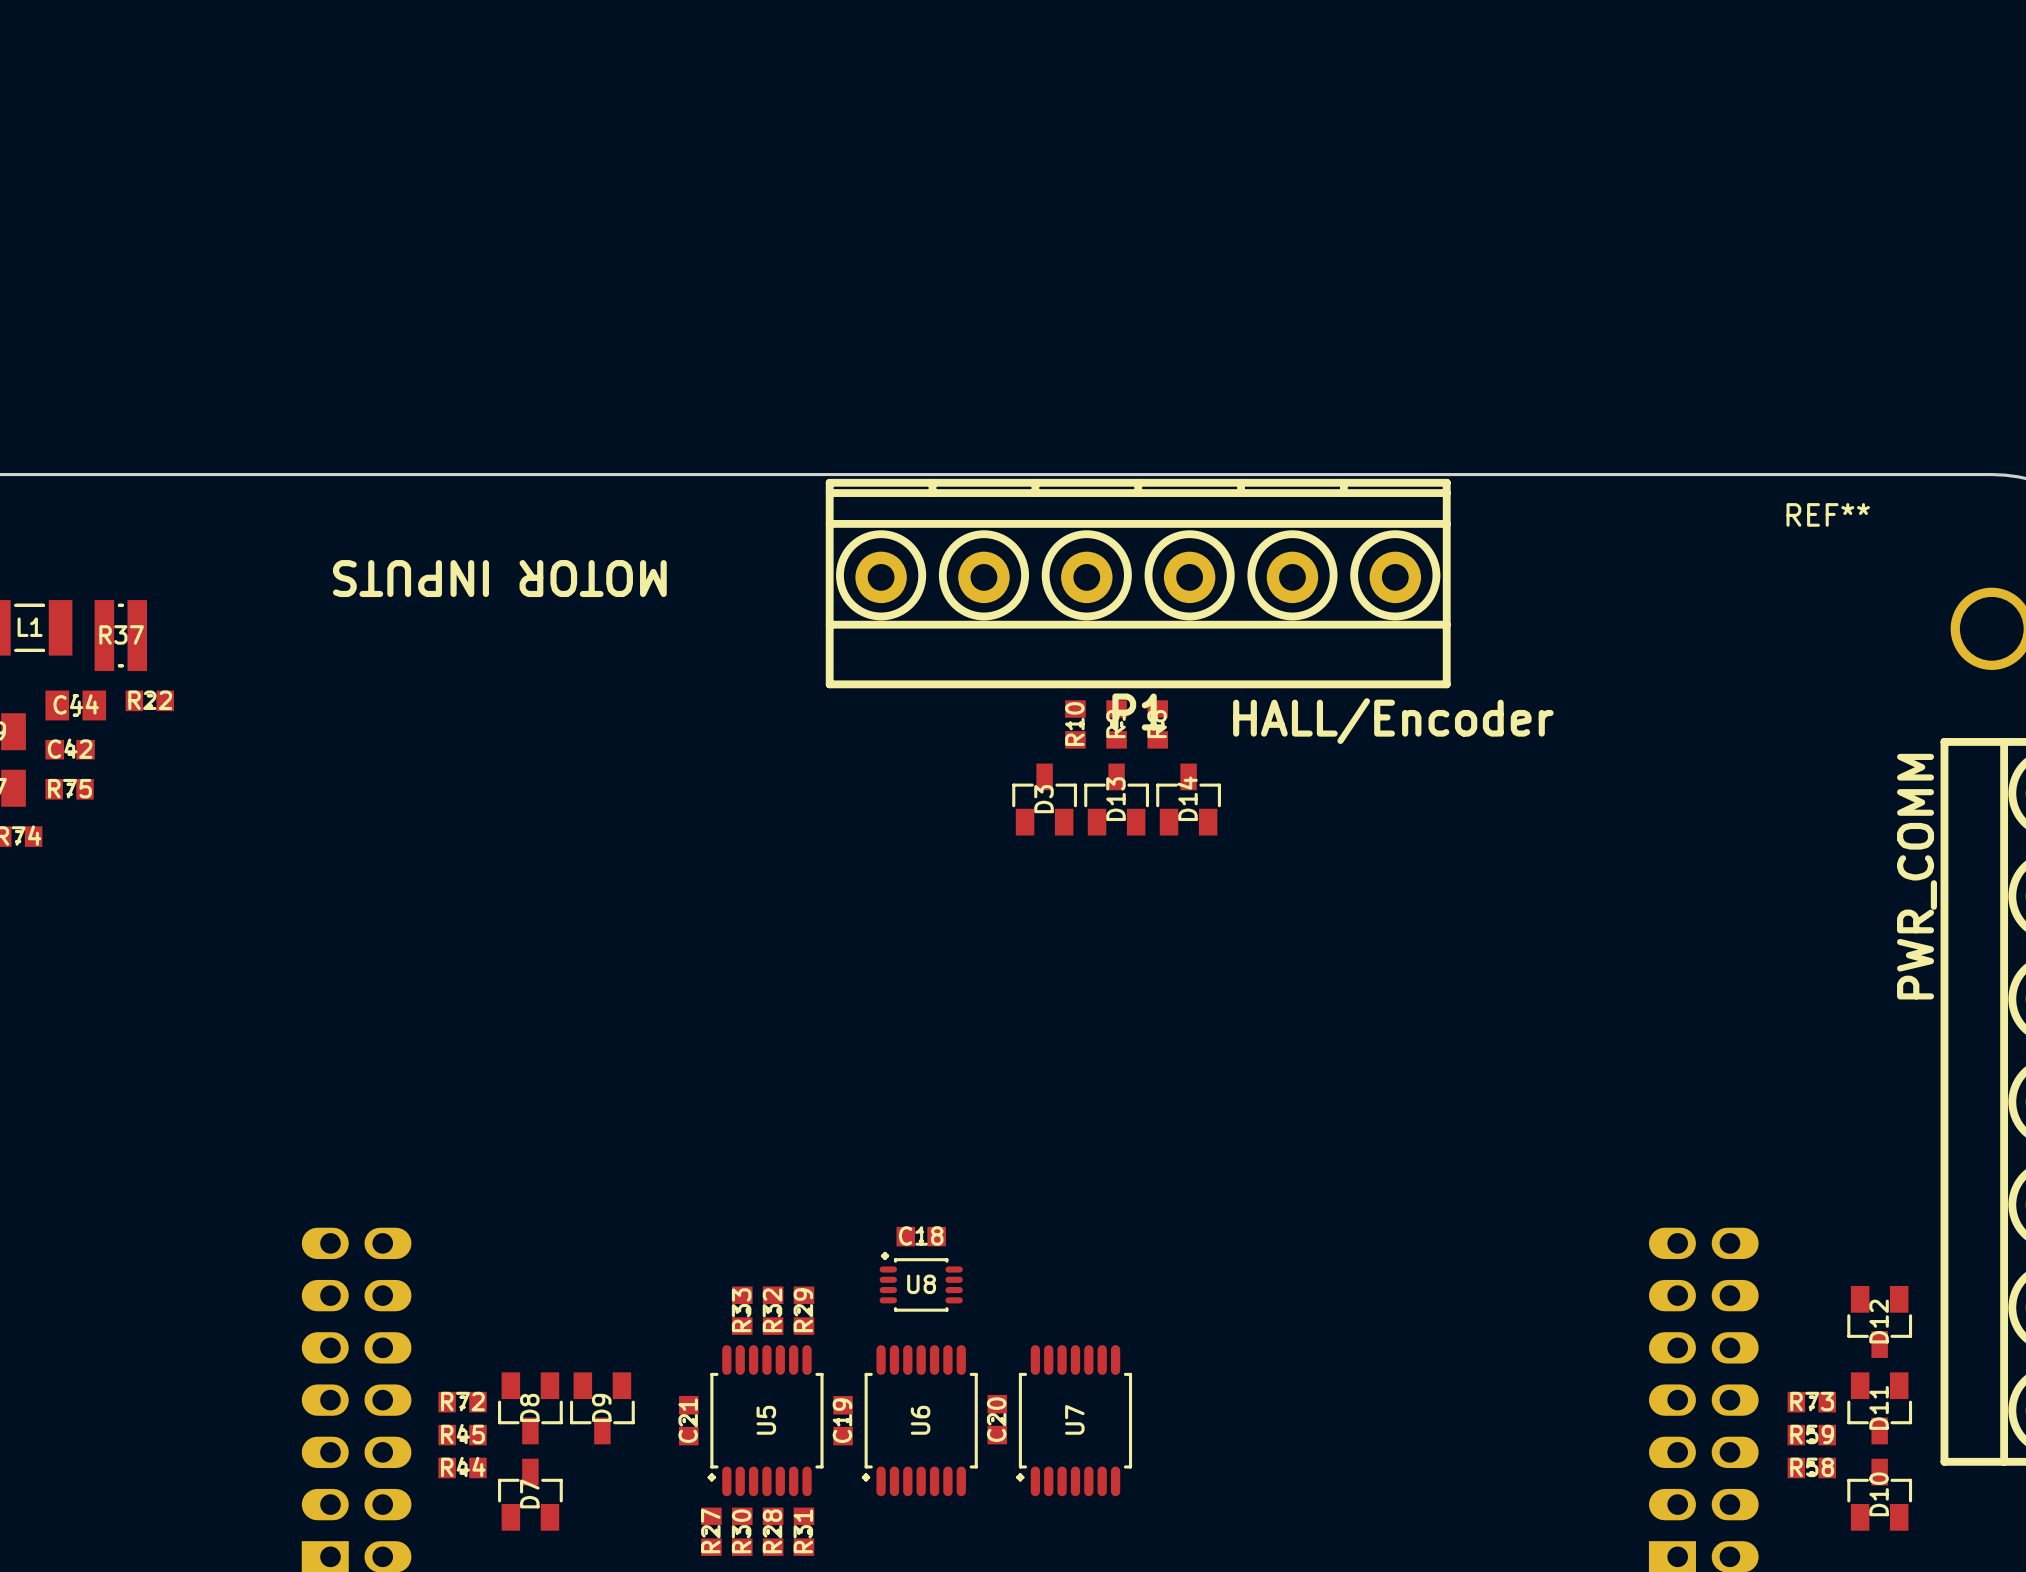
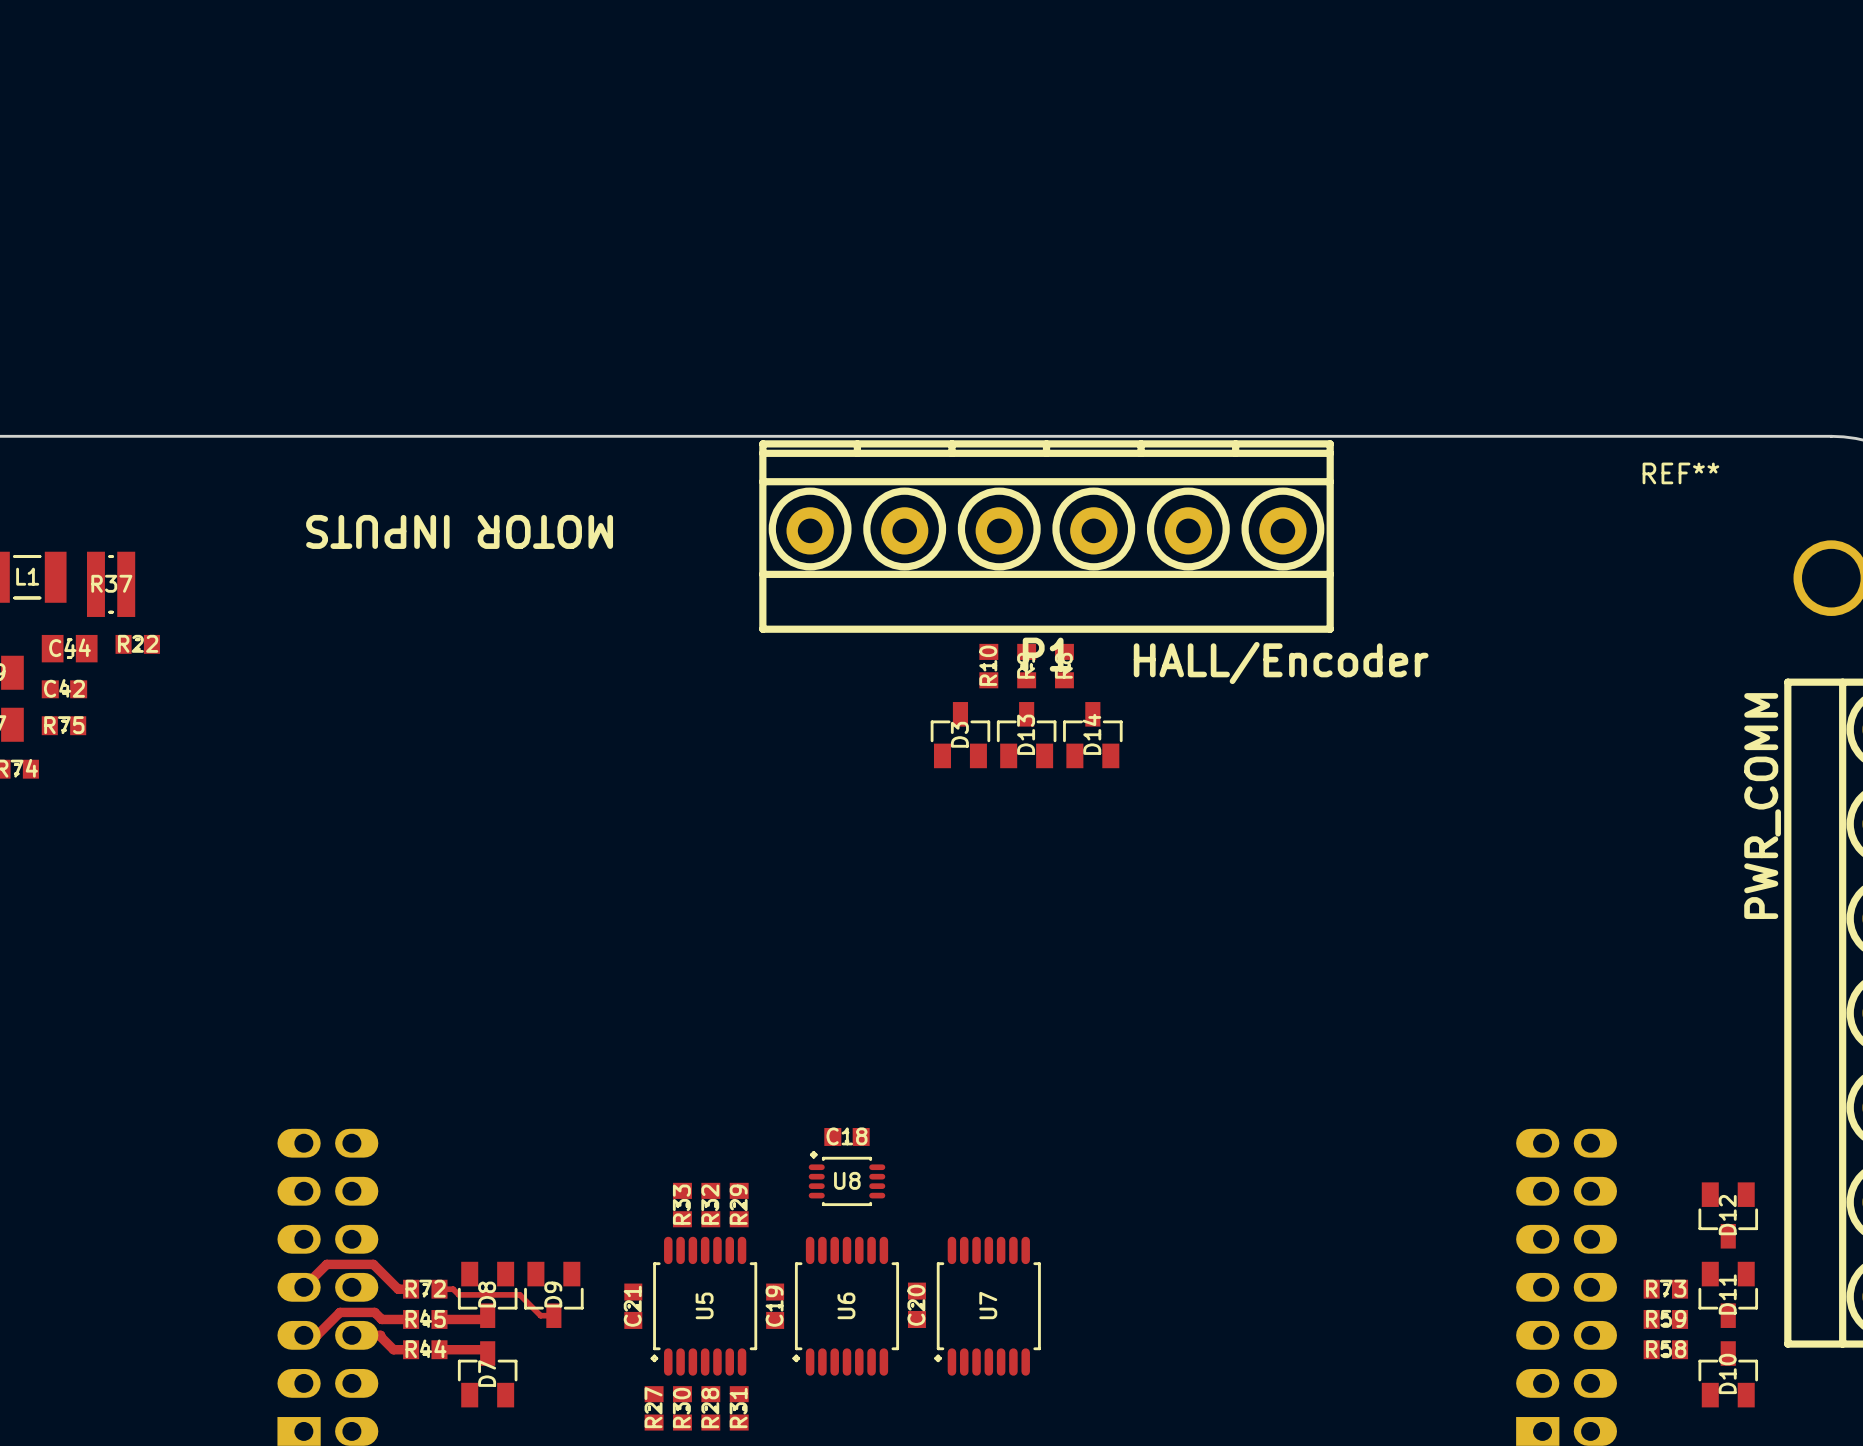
track: none -> (303, 1287) (326, 1264) (373, 1264) (398, 1289) (411, 1289)
track: none -> (439, 1289) (453, 1289) (458, 1294) (519, 1294) (540, 1315) (553, 1315)
track: none -> (487, 1315) (483, 1319) (439, 1319)
track: none -> (411, 1319) (381, 1319) (374, 1312) (340, 1312) (317, 1335) (303, 1335)
track: none -> (351, 1335) (380, 1335) (393, 1349) (411, 1349)
track: none -> (439, 1349) (483, 1349) (487, 1353)

